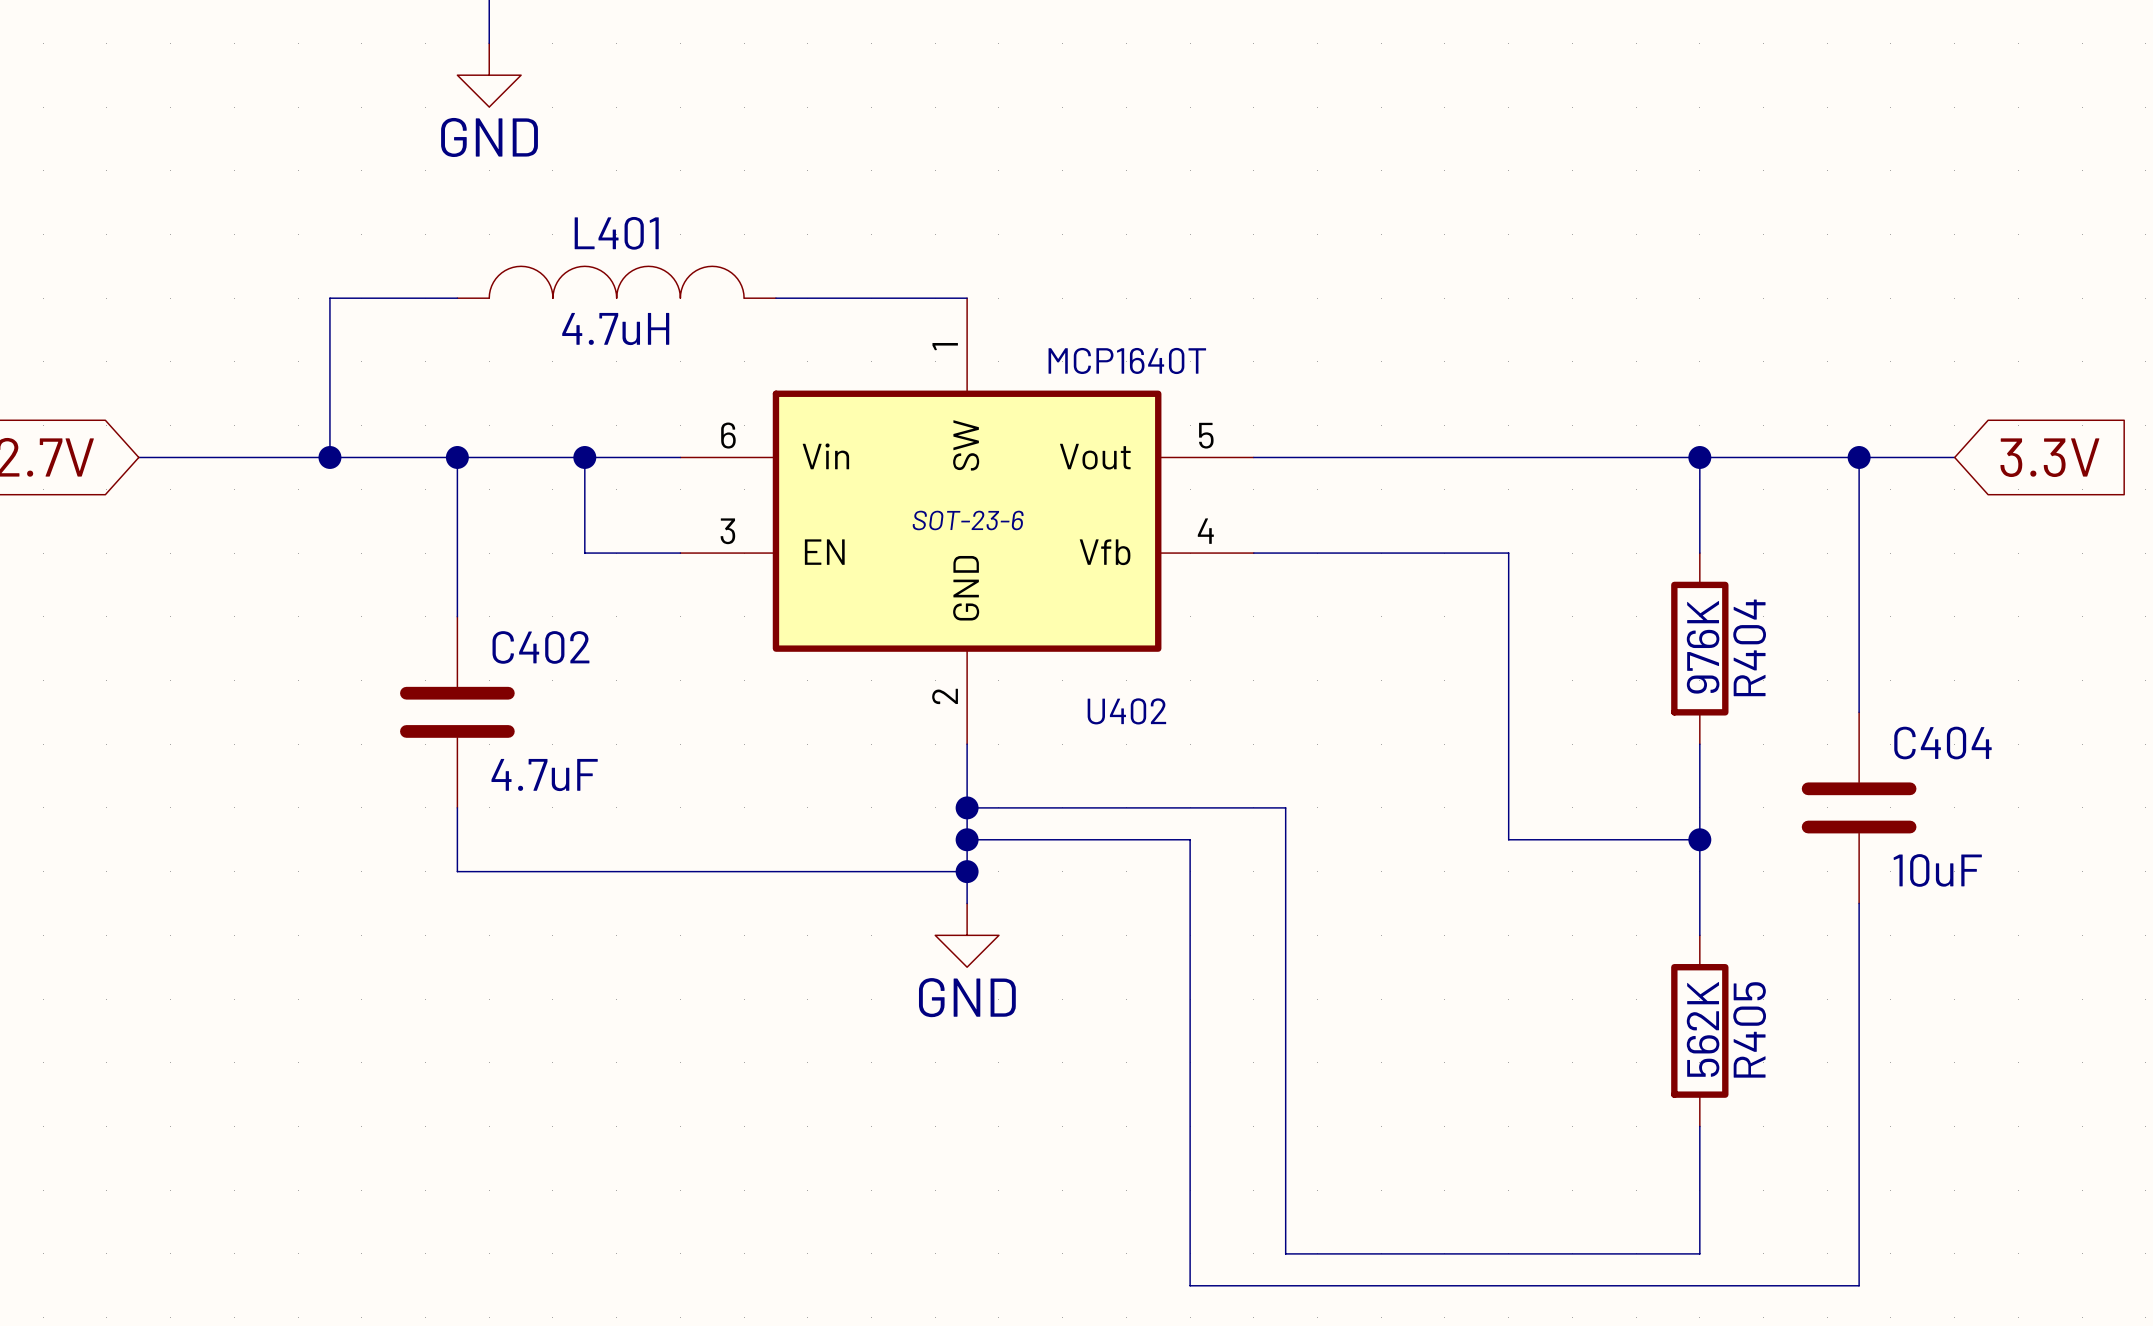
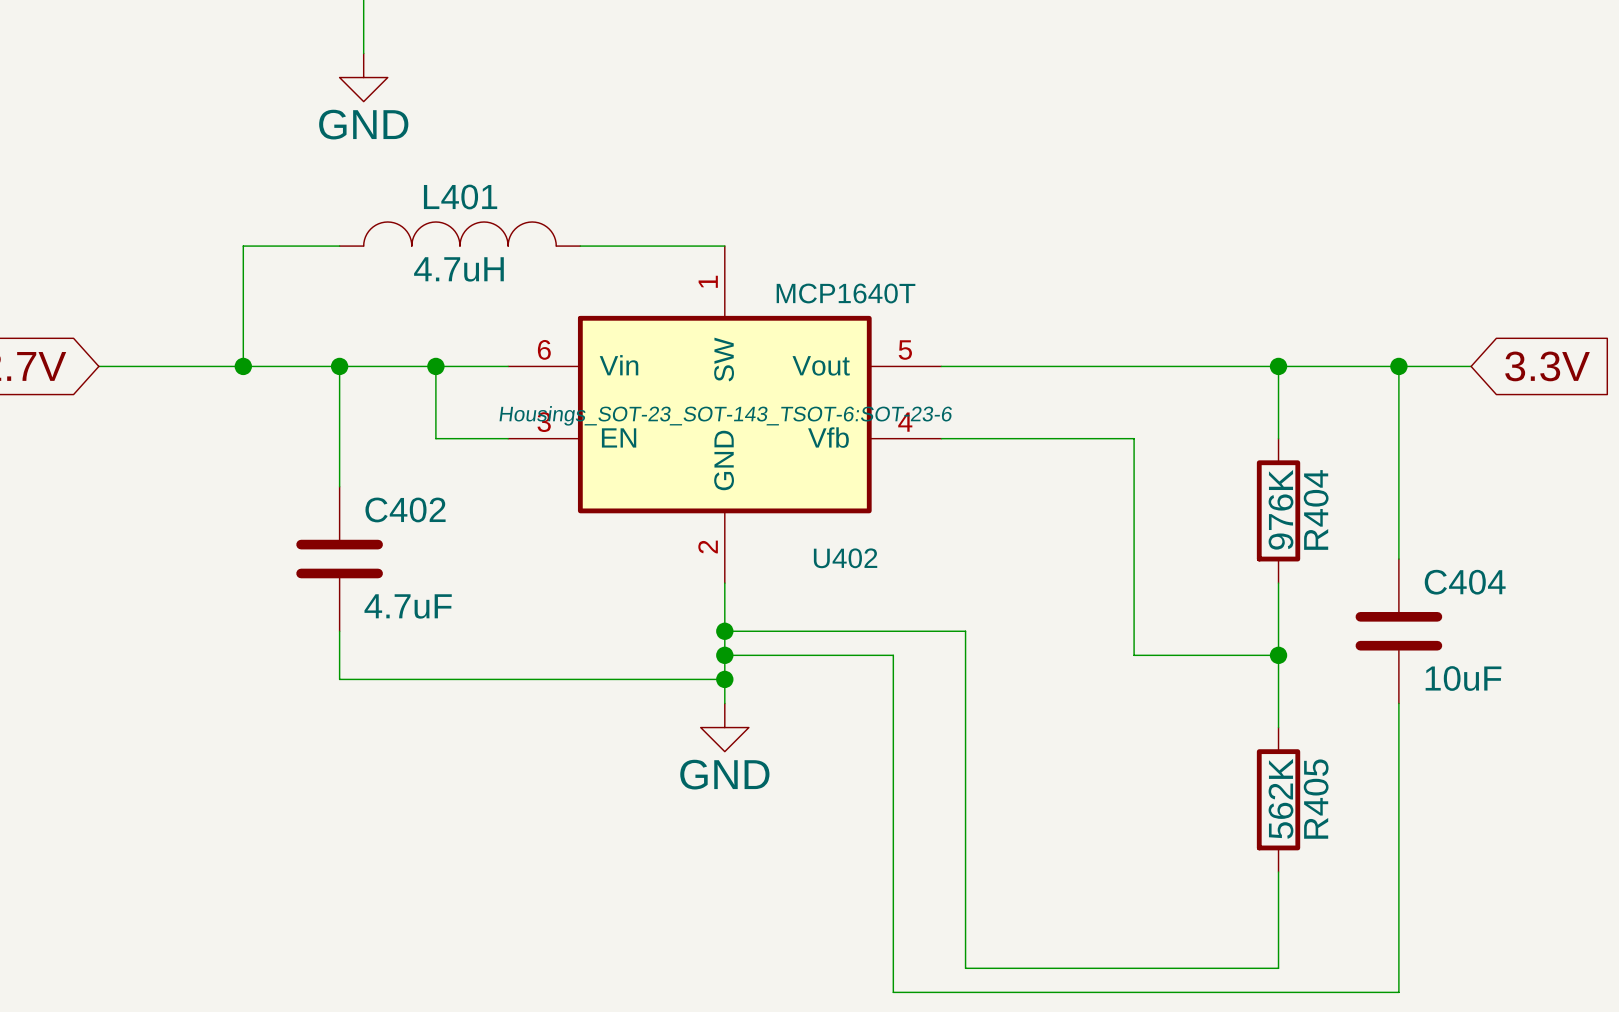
U402 text: SOT-23-6 (968, 520) -> Housings_SOT-23_SOT-143_TSOT-6:SOT-23-6 (725, 415)

